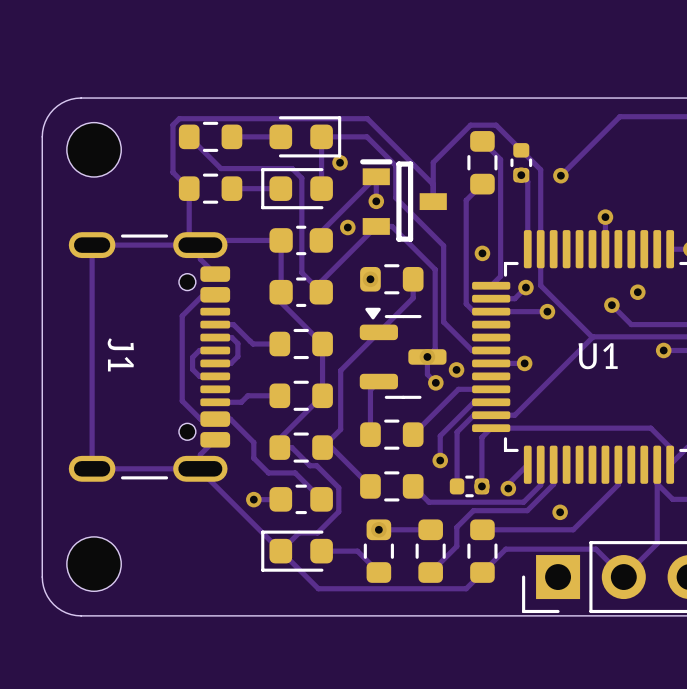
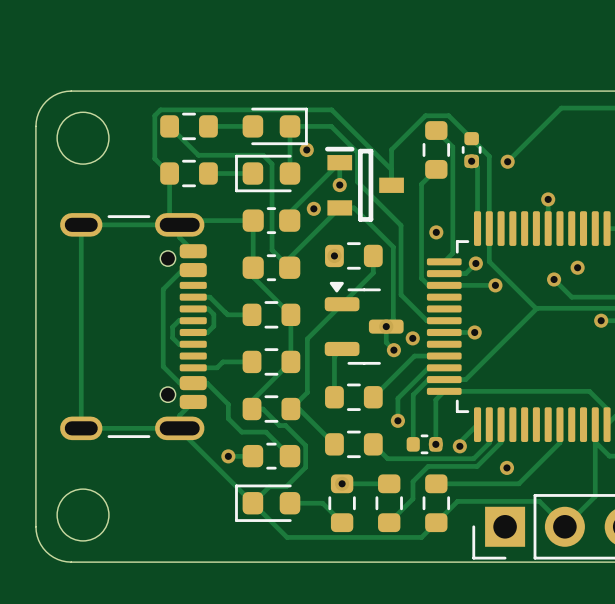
round board edge: none -> [56, 111, 110, 165]
part: (94, 149) -> none
J1 name: J1 (120, 354) -> none
U1 name: U1 (598, 356) -> none
round board edge: none -> [56, 488, 110, 542]
part: (94, 564) -> none

